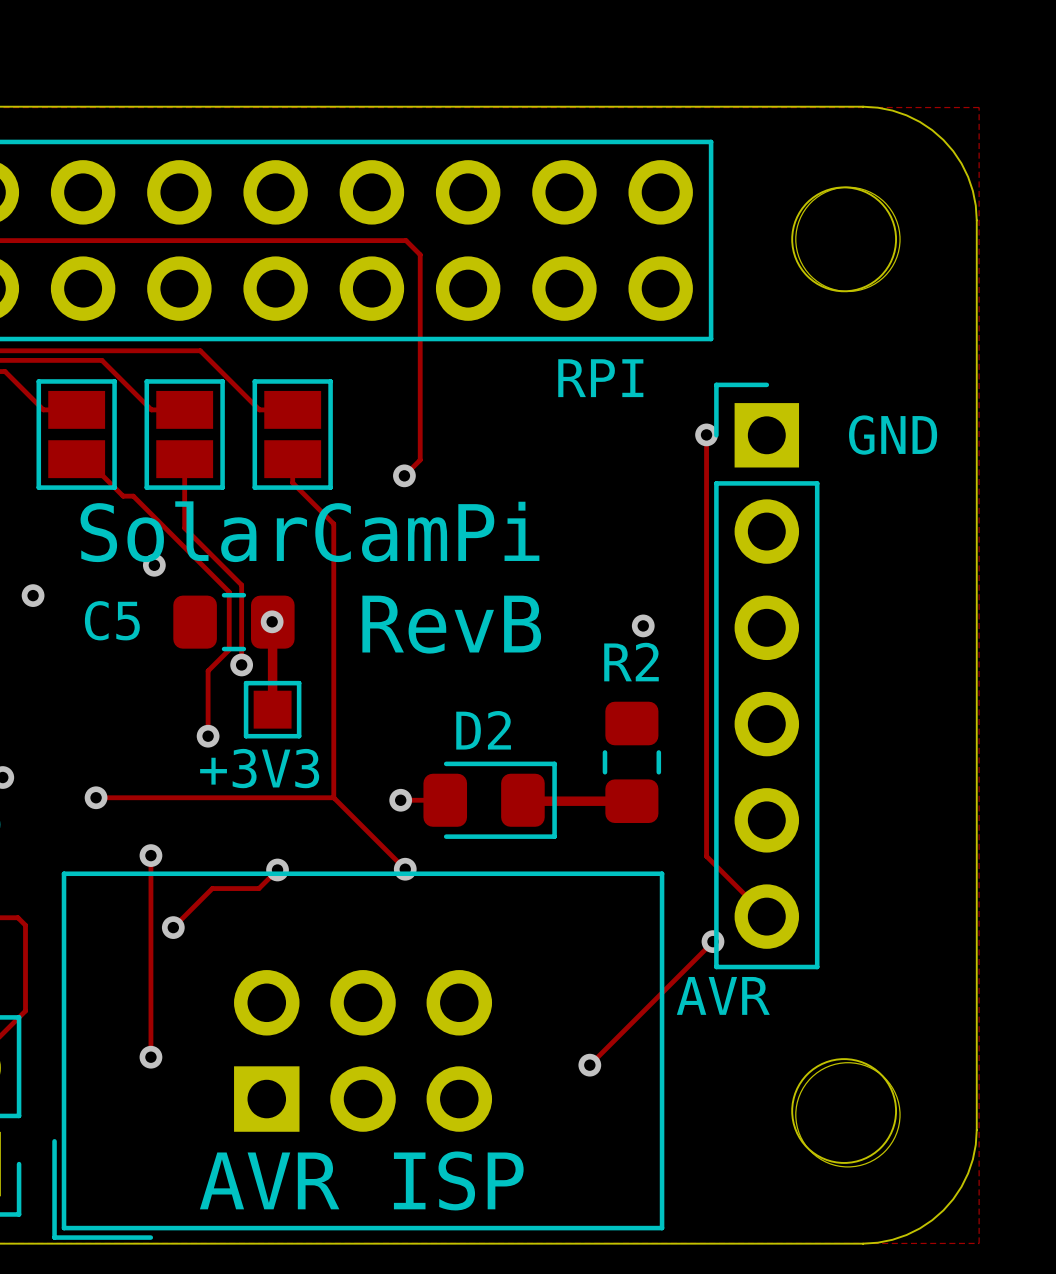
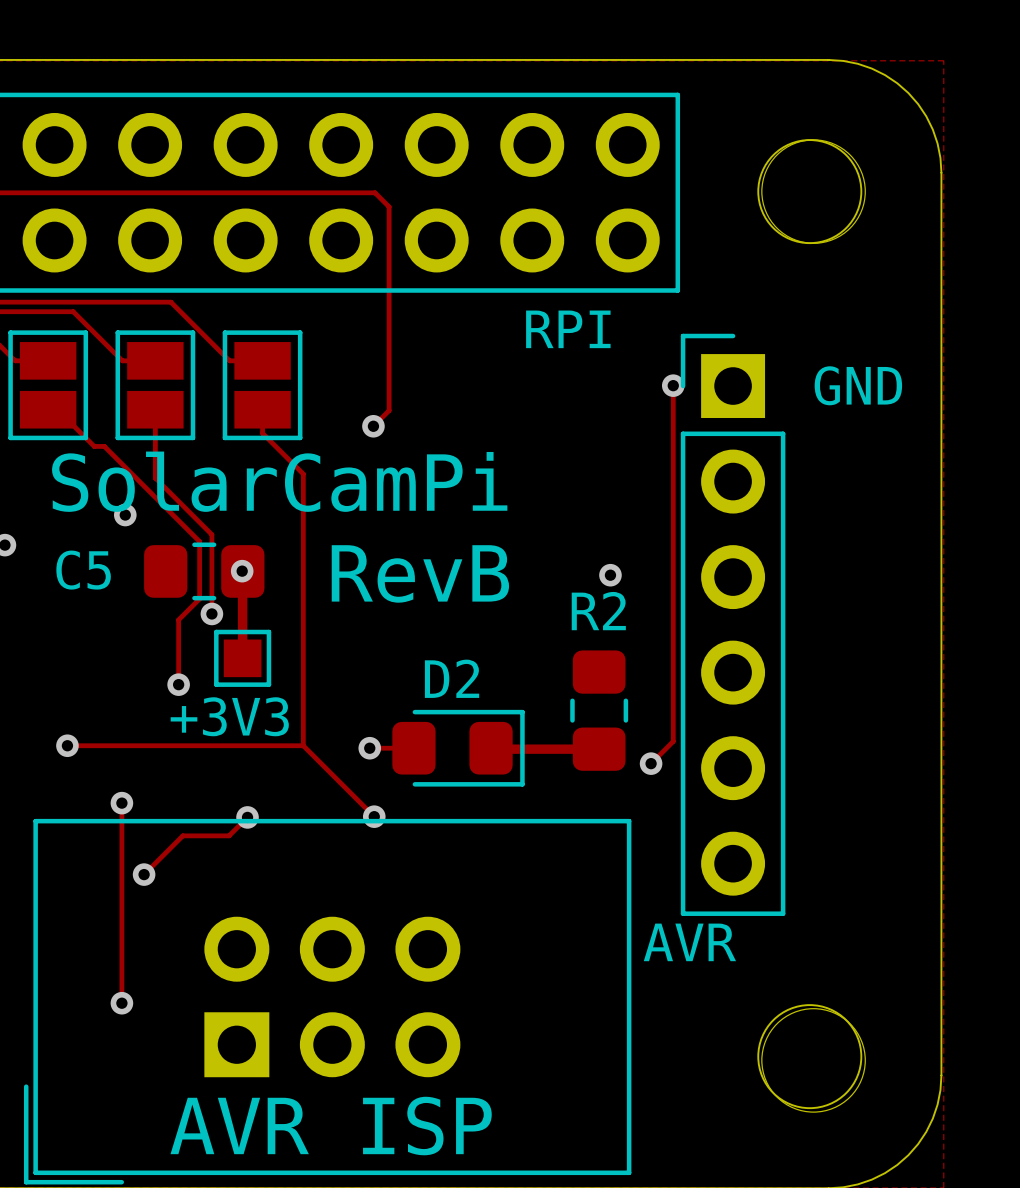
track: (706, 793) (706, 856) (766, 916) -> (673, 741) (651, 763)
track: (712, 941) (589, 1065) -> none
via position: (712, 941) -> (651, 763)
via: (589, 1065) -> none

